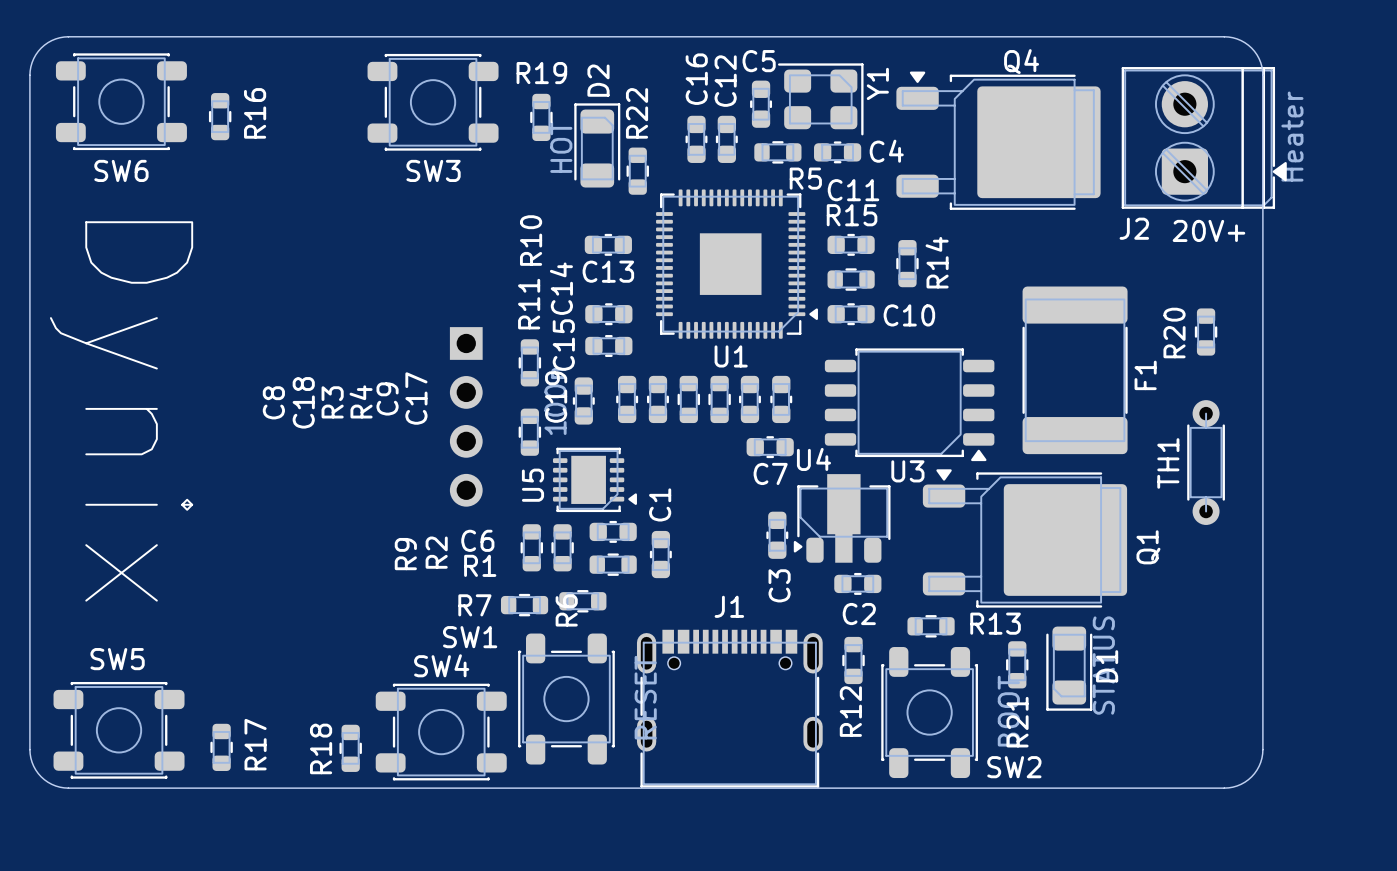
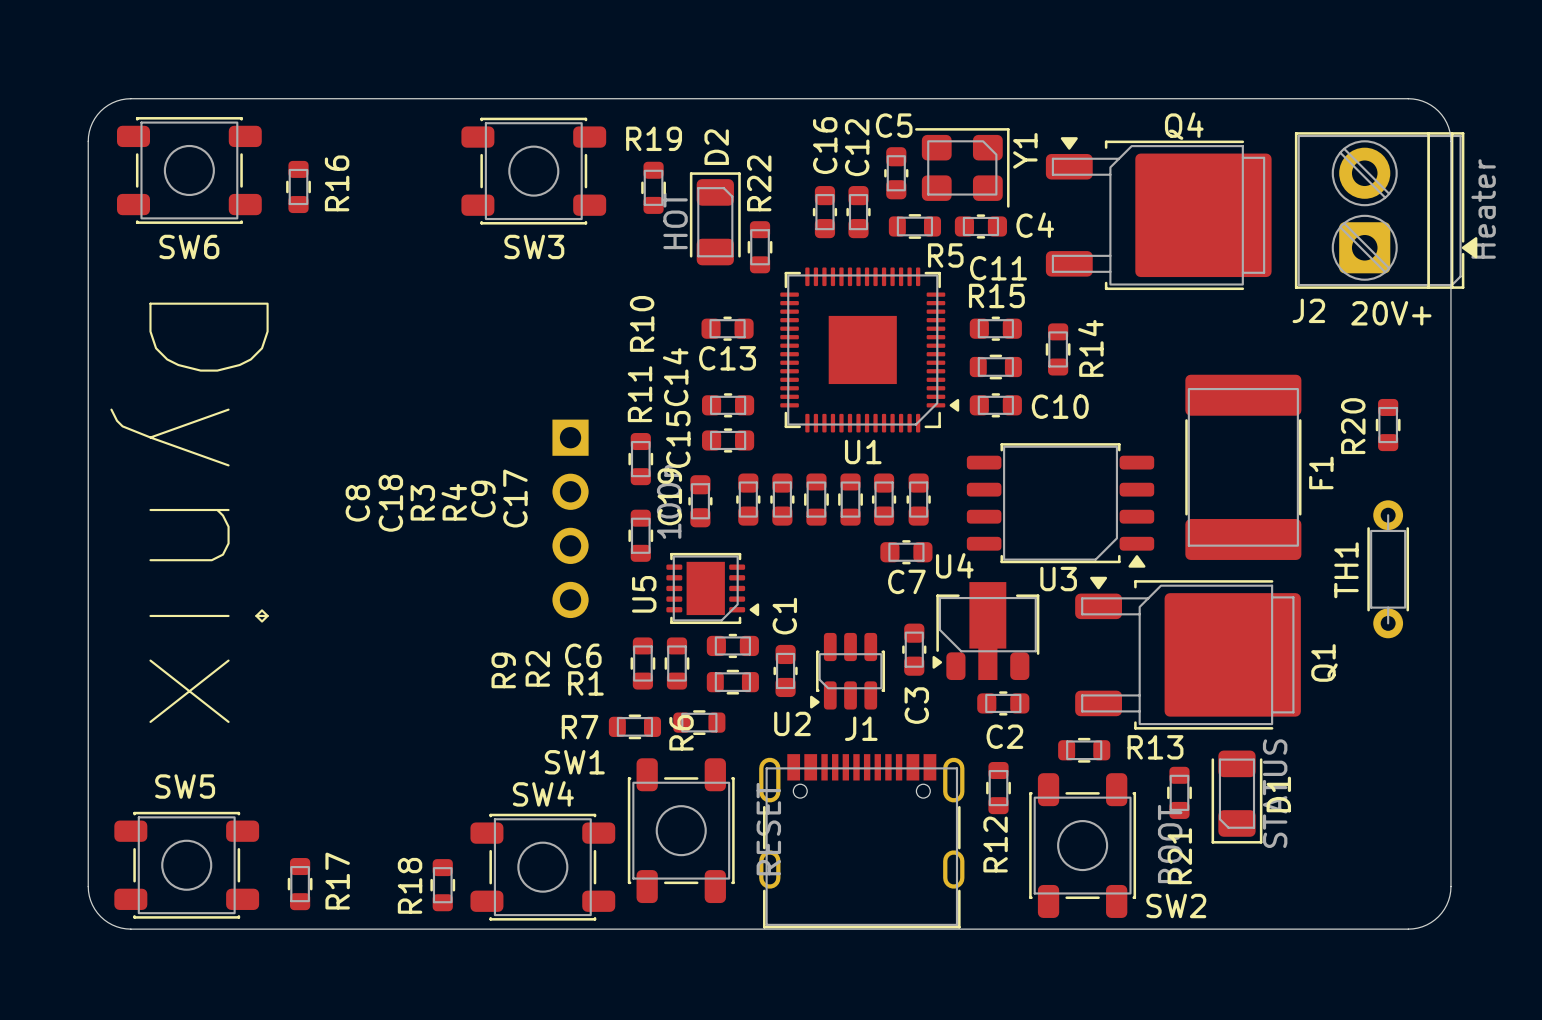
U2: none -> (847, 671)

